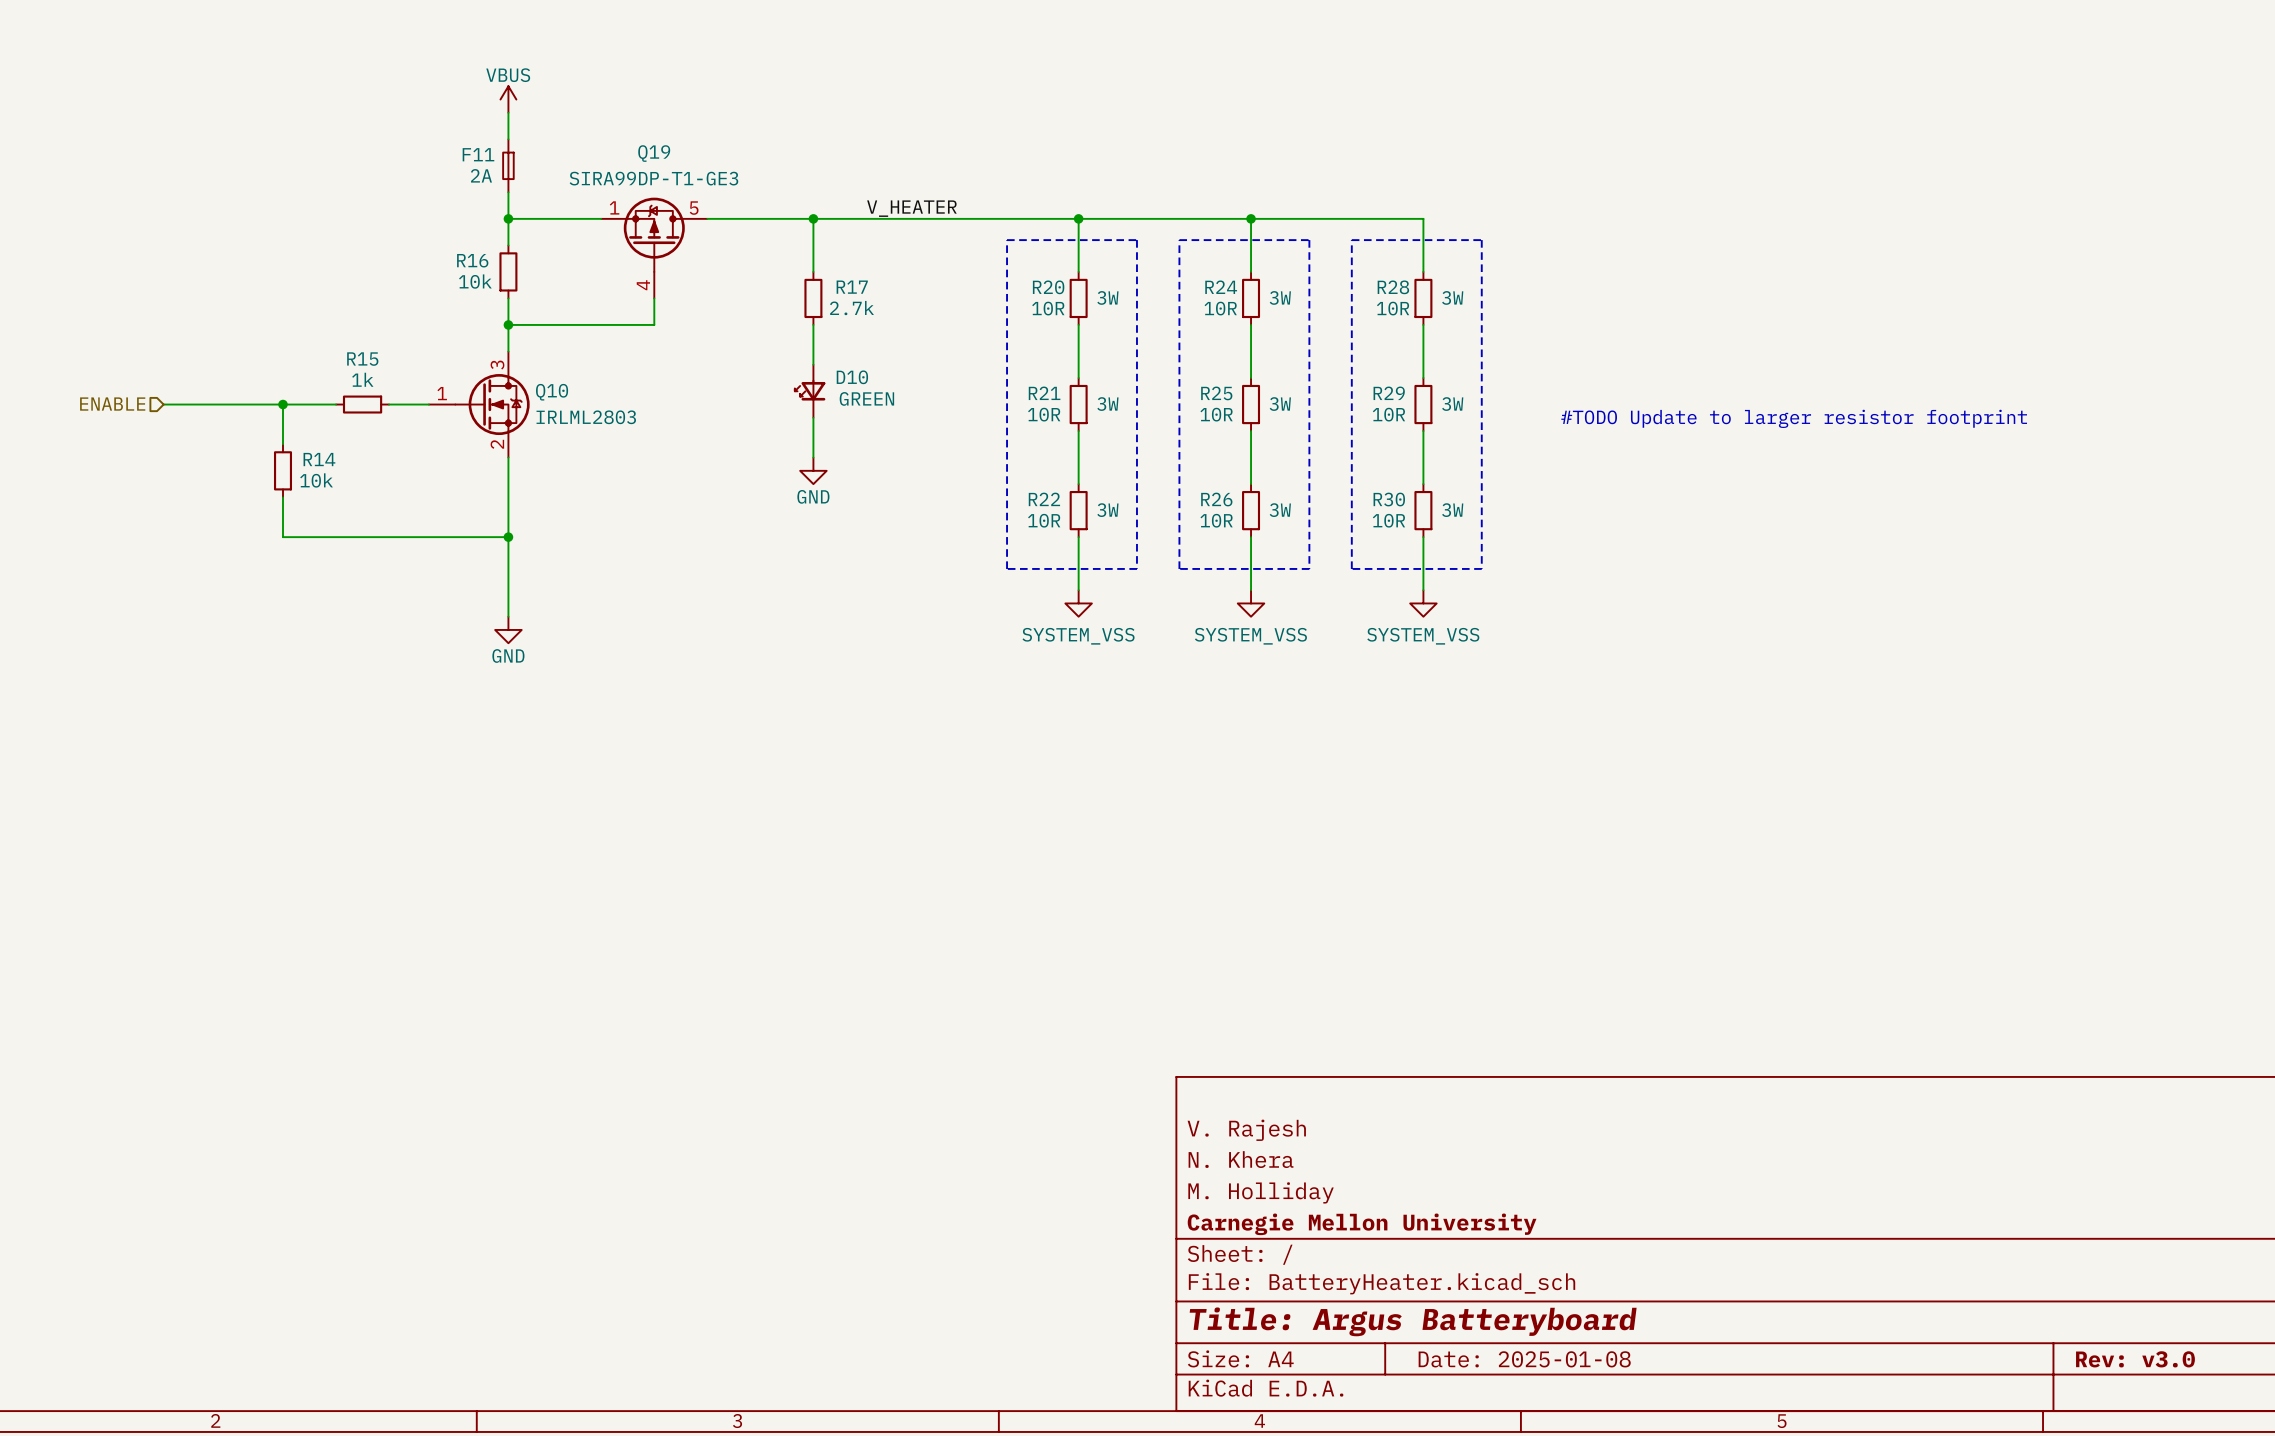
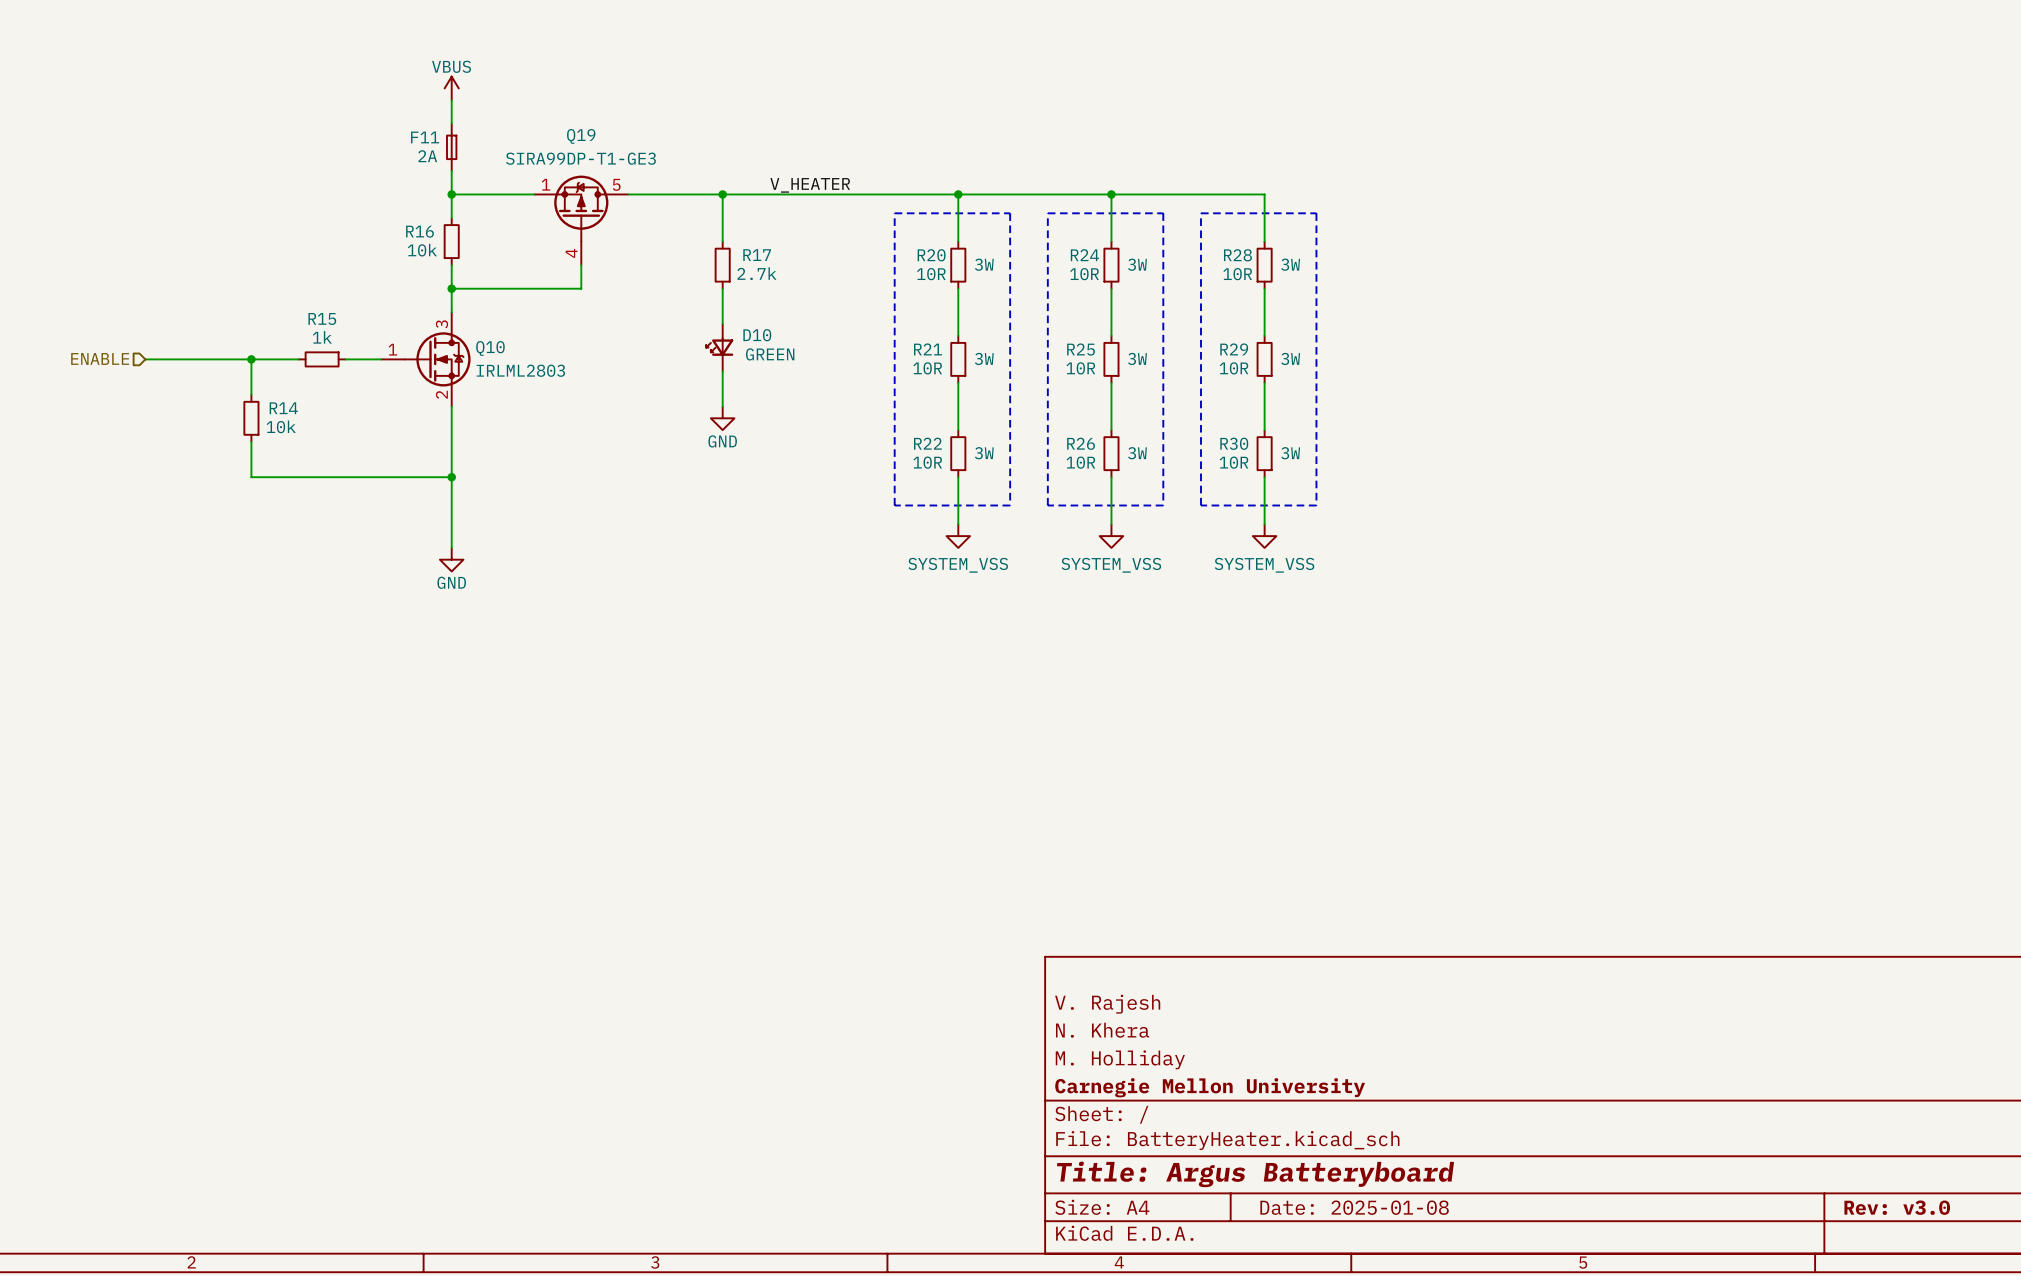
text: #TODO Update to larger resistor footprint (1794, 418) -> none

